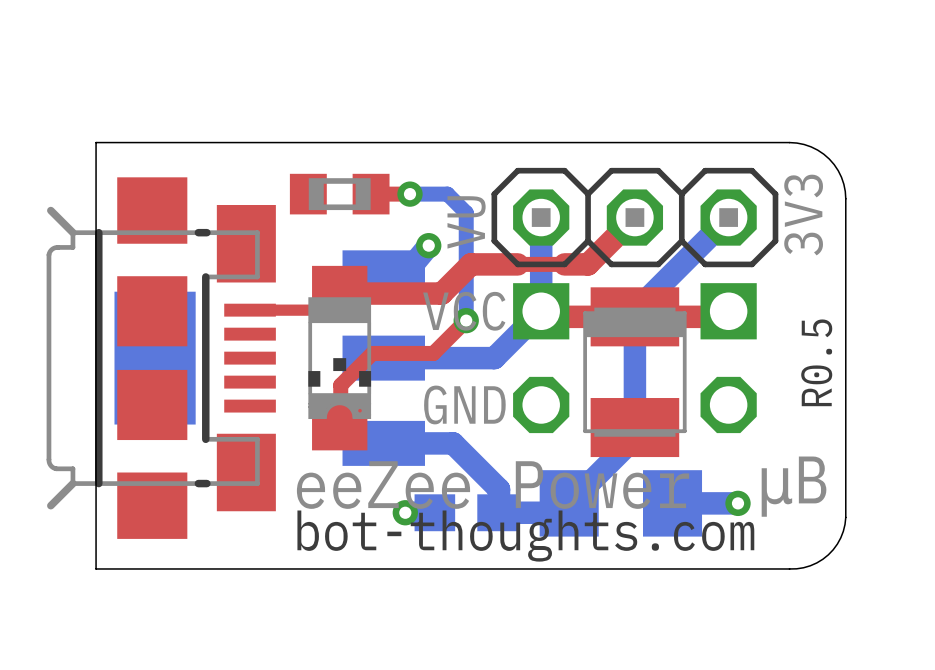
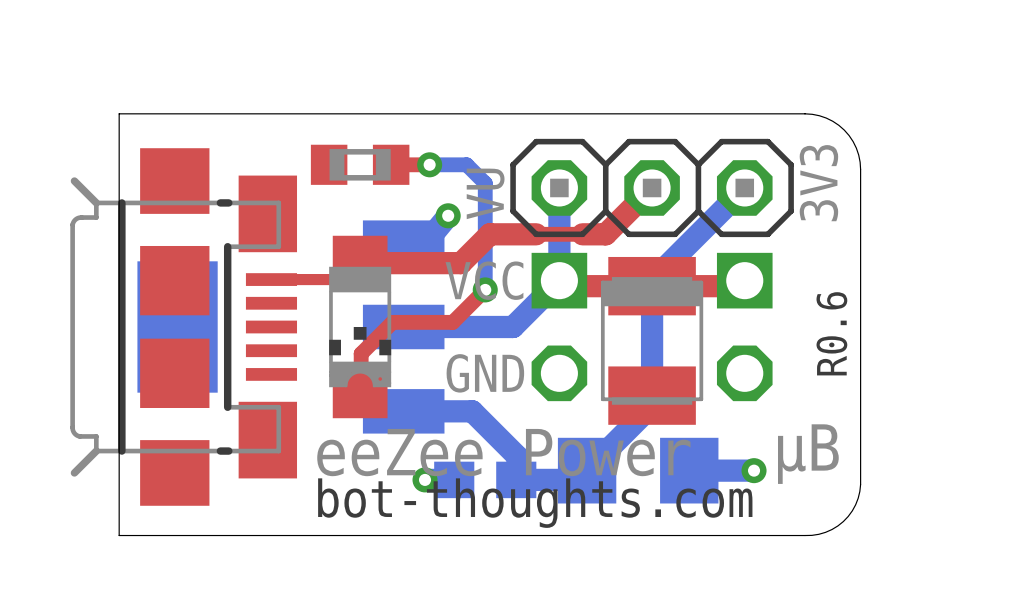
text: R0.5 (816, 362) -> R0.6 (831, 333)

